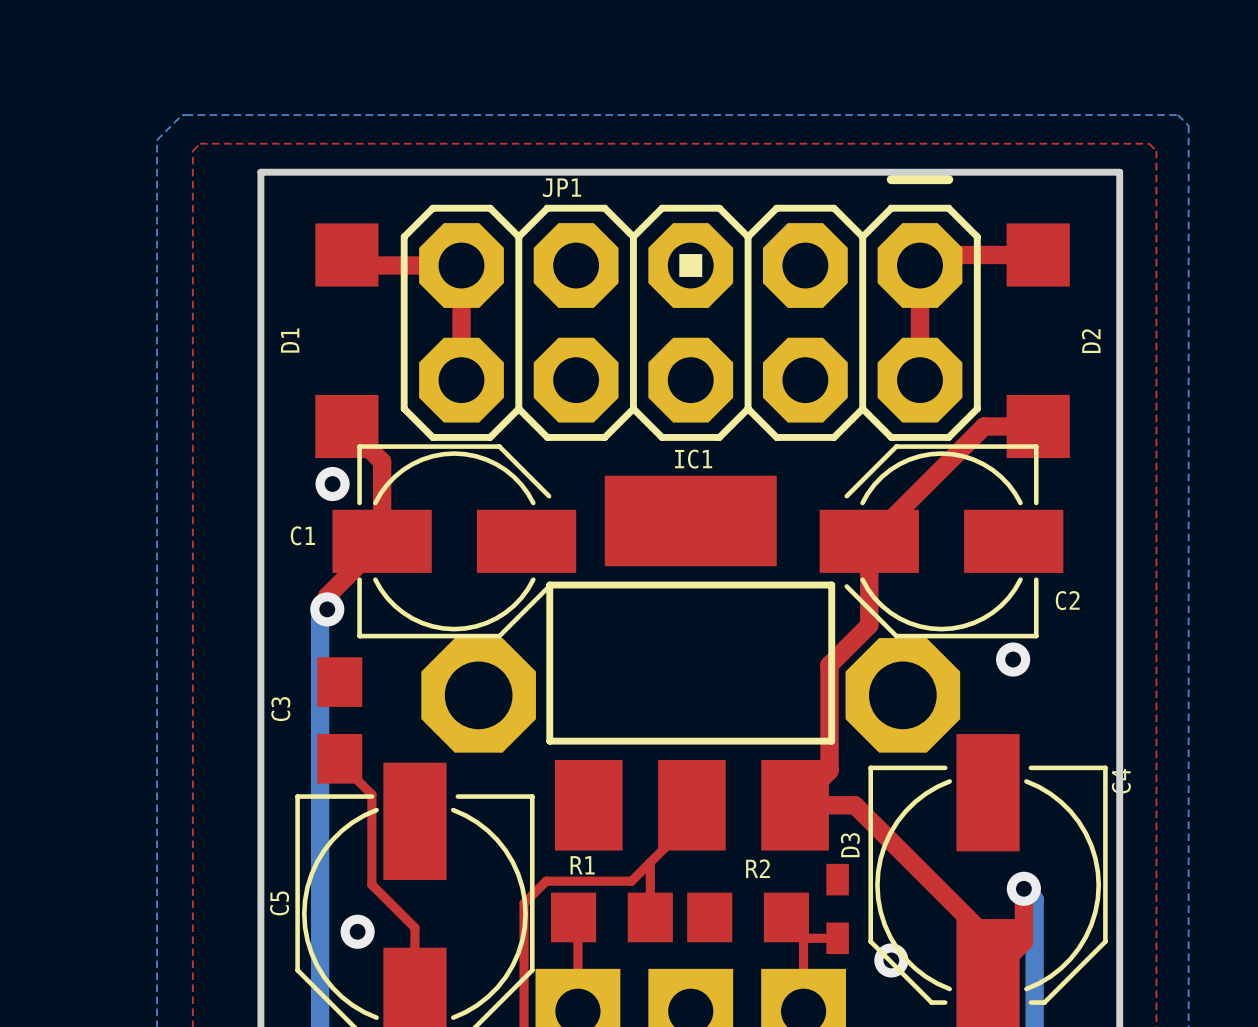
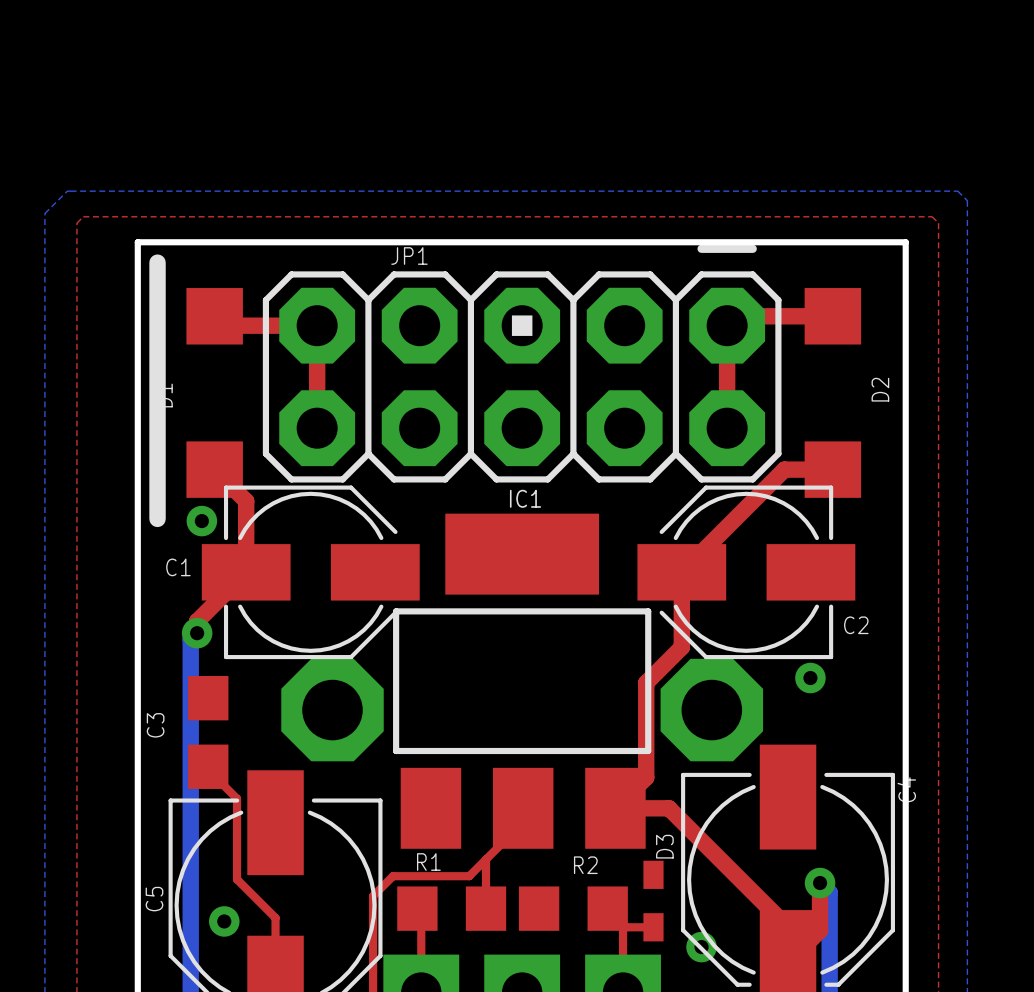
line: none -> (157, 262) (157, 518)

